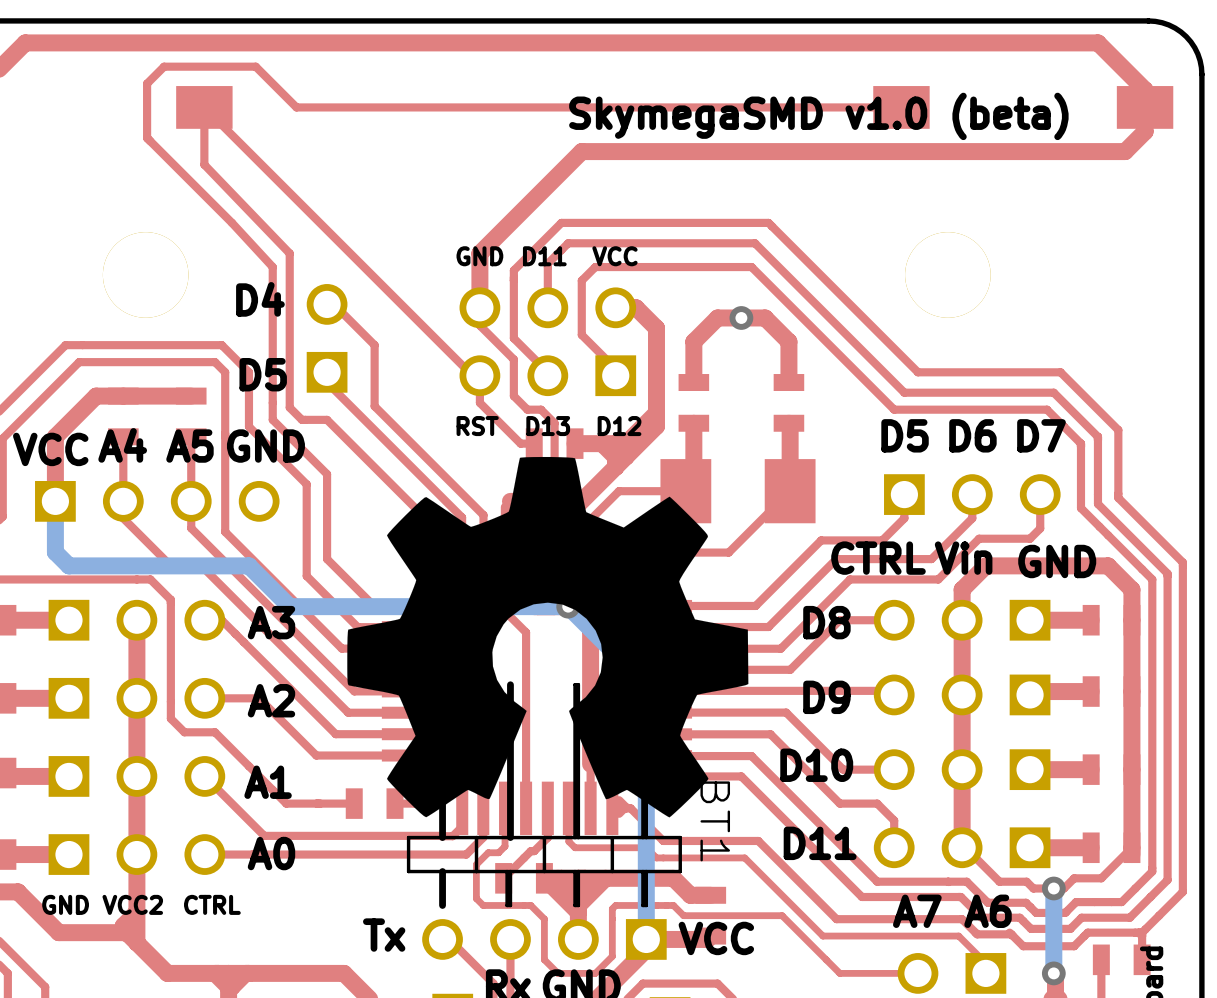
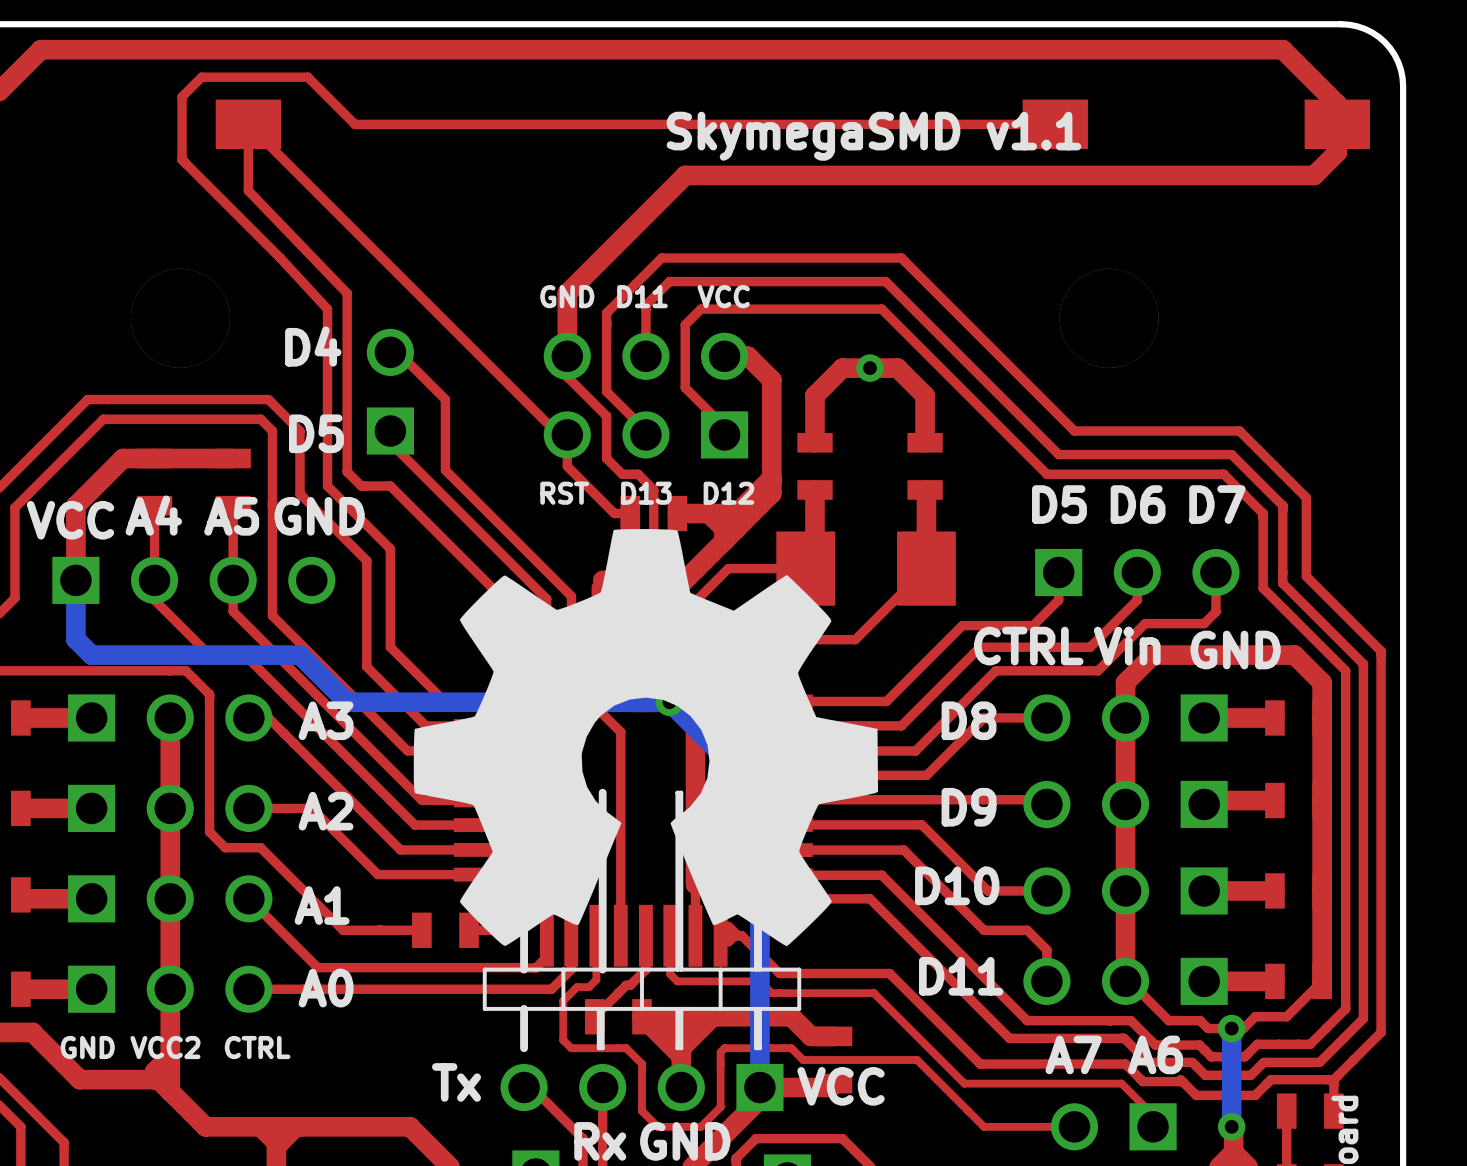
text: SkymegaSMD v1.0 (beta) (818, 116) -> SkymegaSMD v1.1 (873, 136)
BT1 name: BT1 (715, 821) -> none

